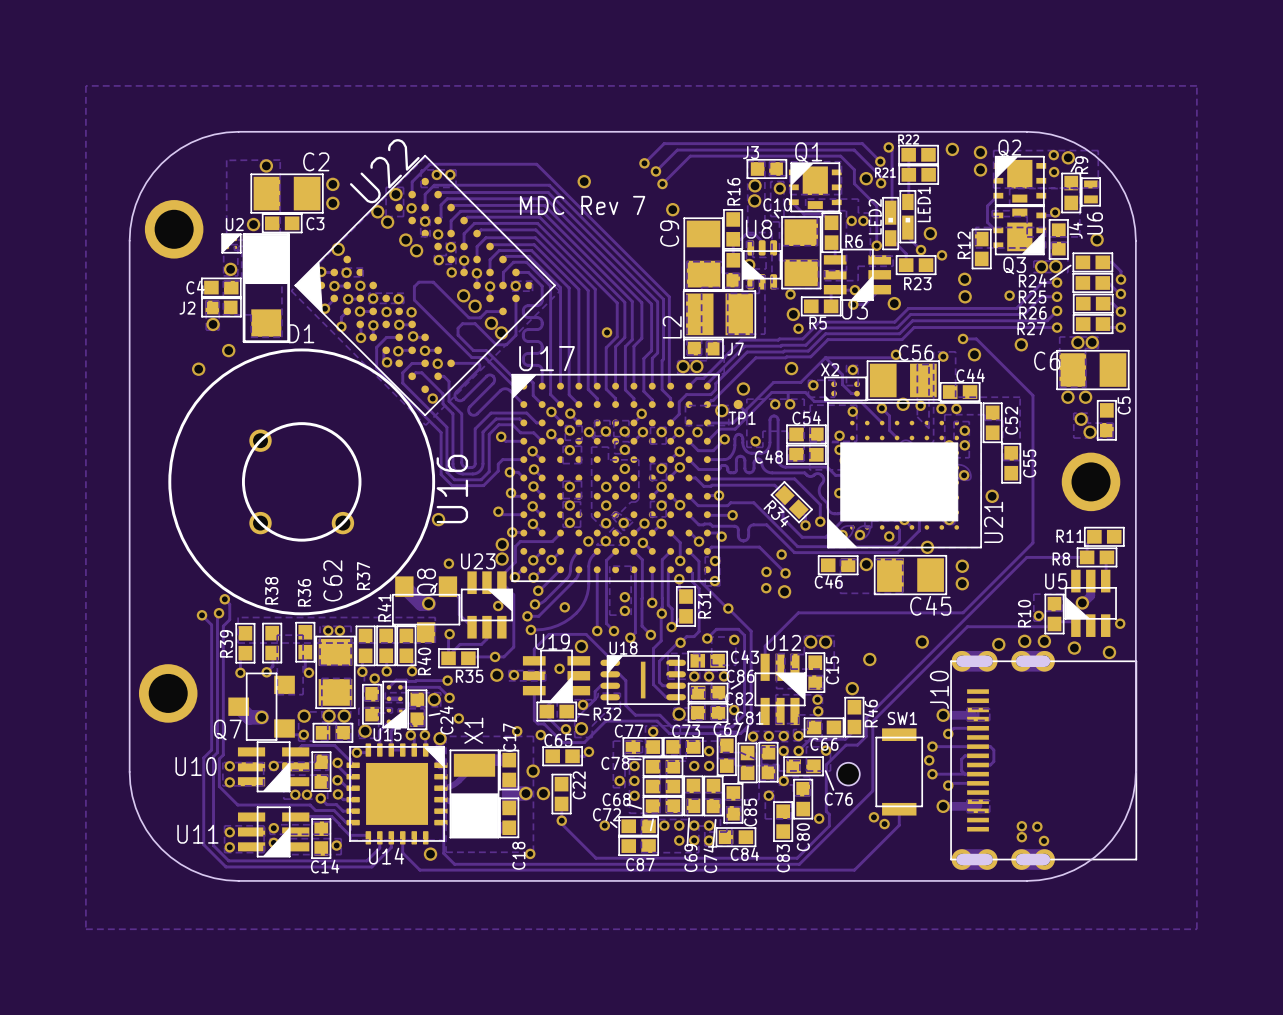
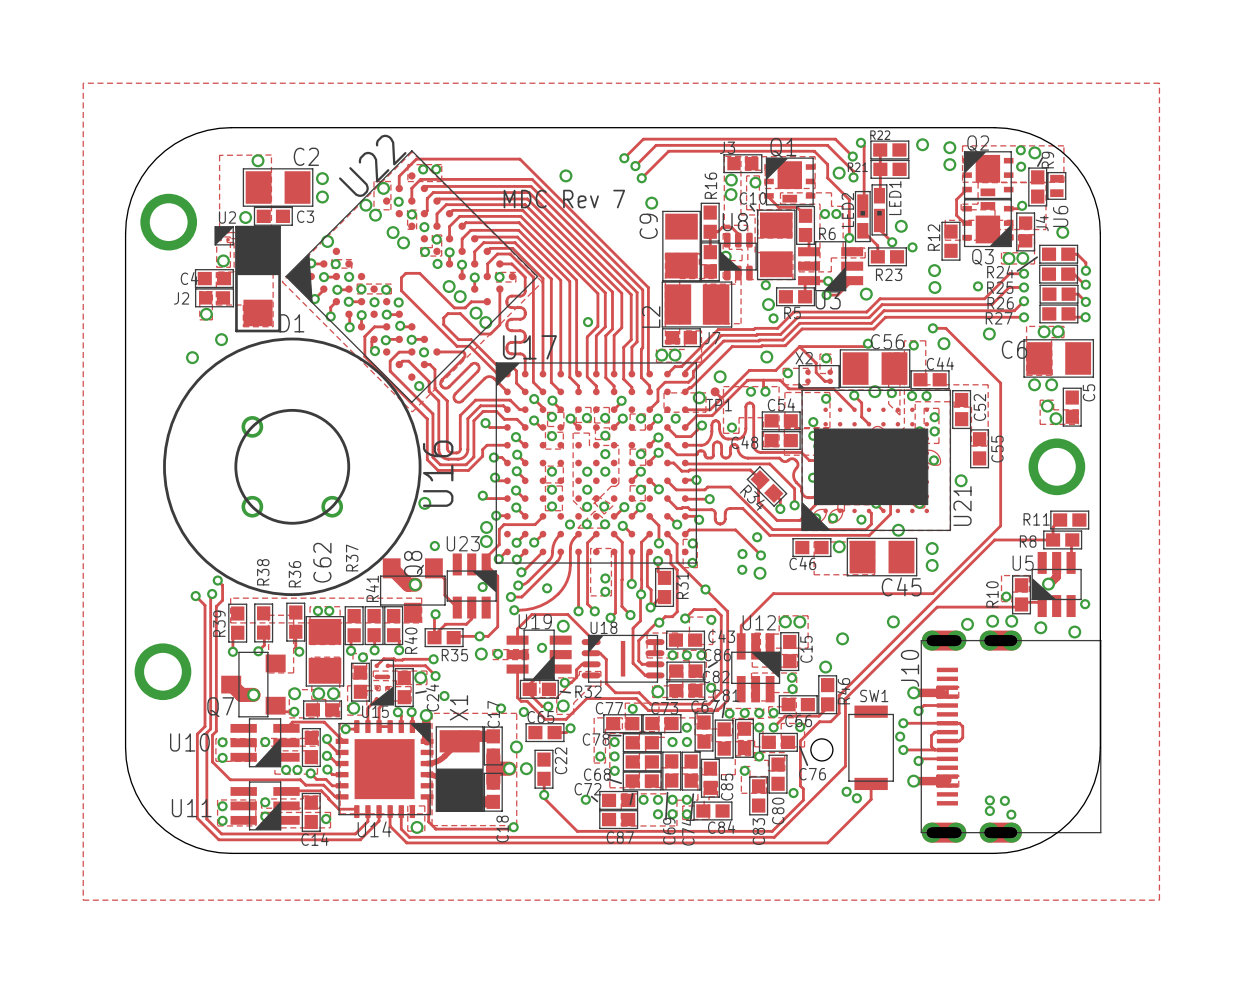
track: (442, 824) (443, 853) (454, 864) (799, 864) -> (401, 811) (401, 829) (409, 837) (774, 837)
track: none -> (428, 798) (428, 821) (435, 829) (511, 829) (513, 826)
zone outline: none -> (407, 805) (407, 831) (424, 831) (424, 805) (407, 805)

